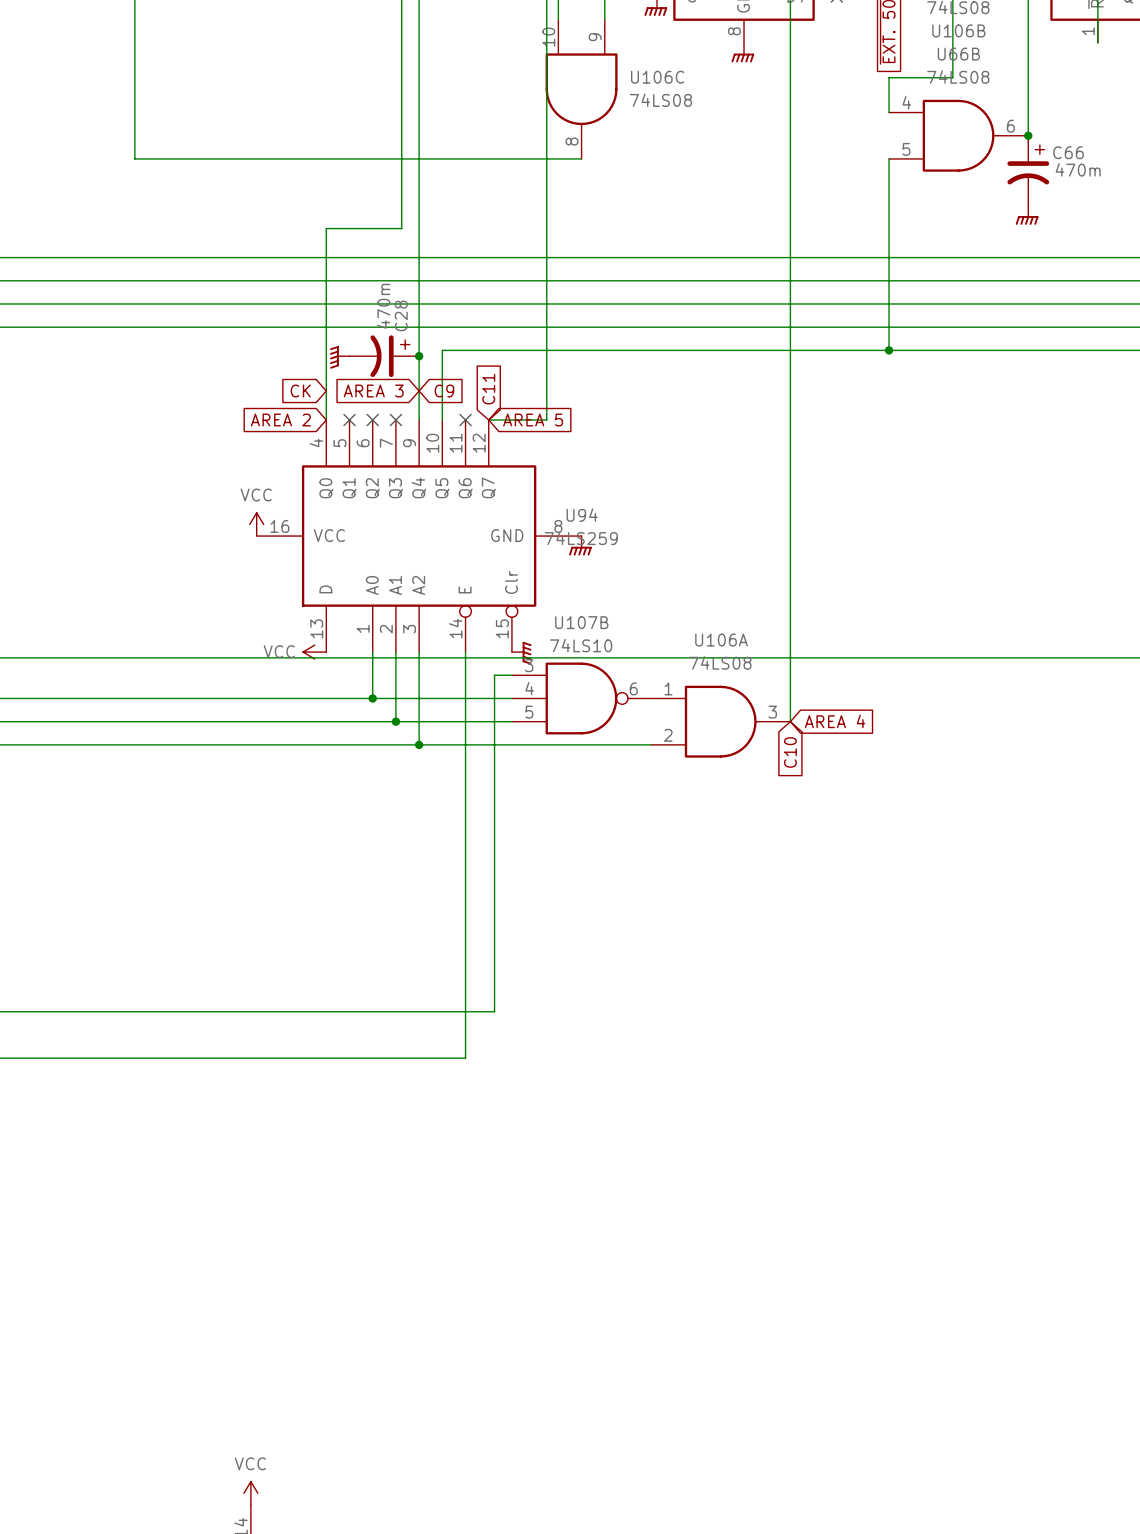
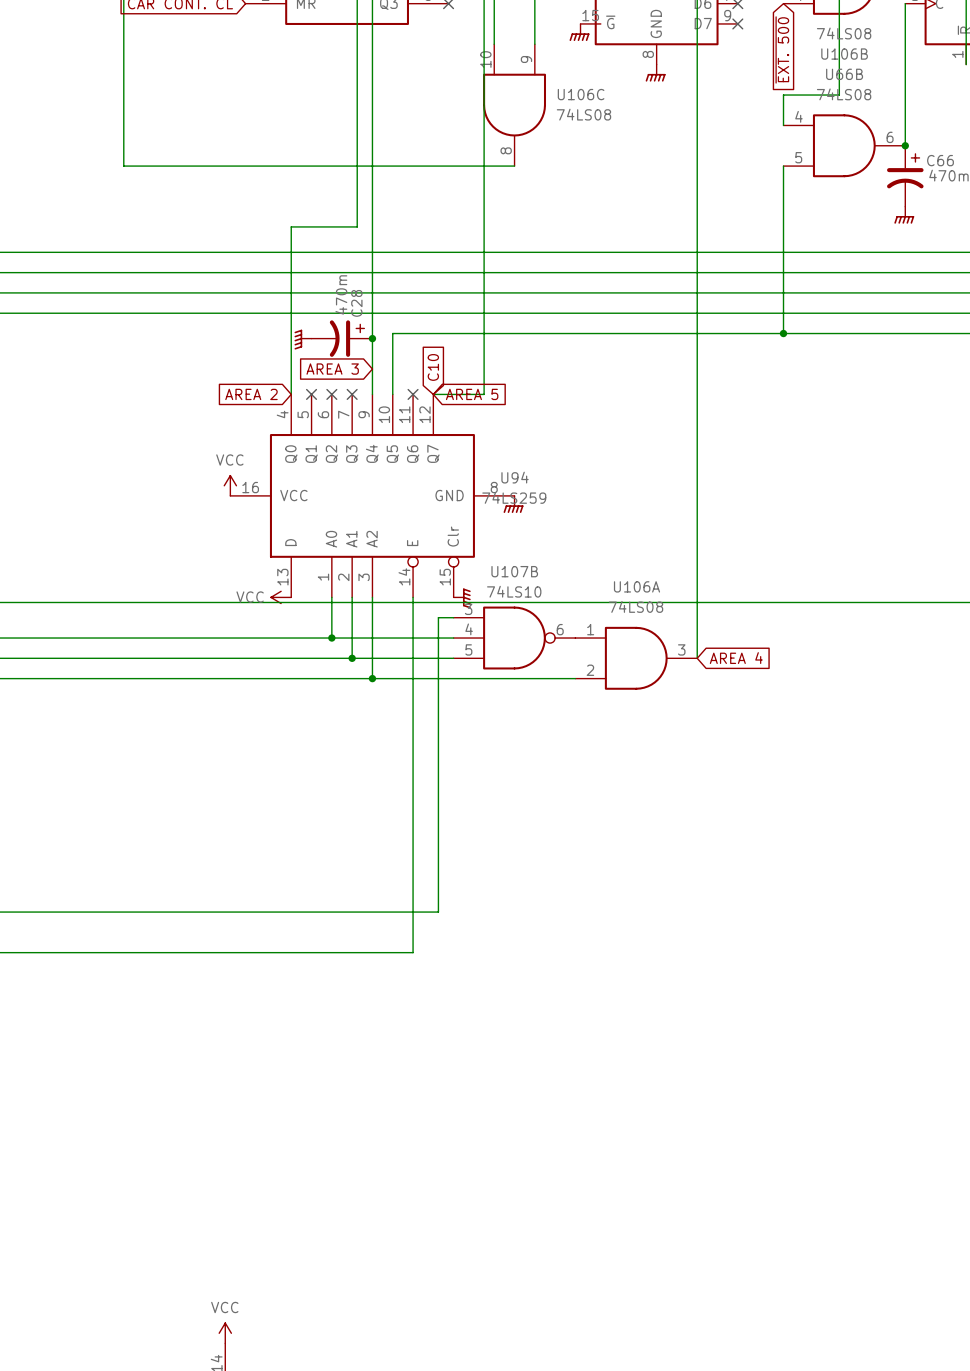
global label: C11 (488, 389) -> C10 (433, 367)
global label: CK (300, 391) -> none
global label: C9 (444, 391) -> none
global label: C10 (790, 752) -> none

